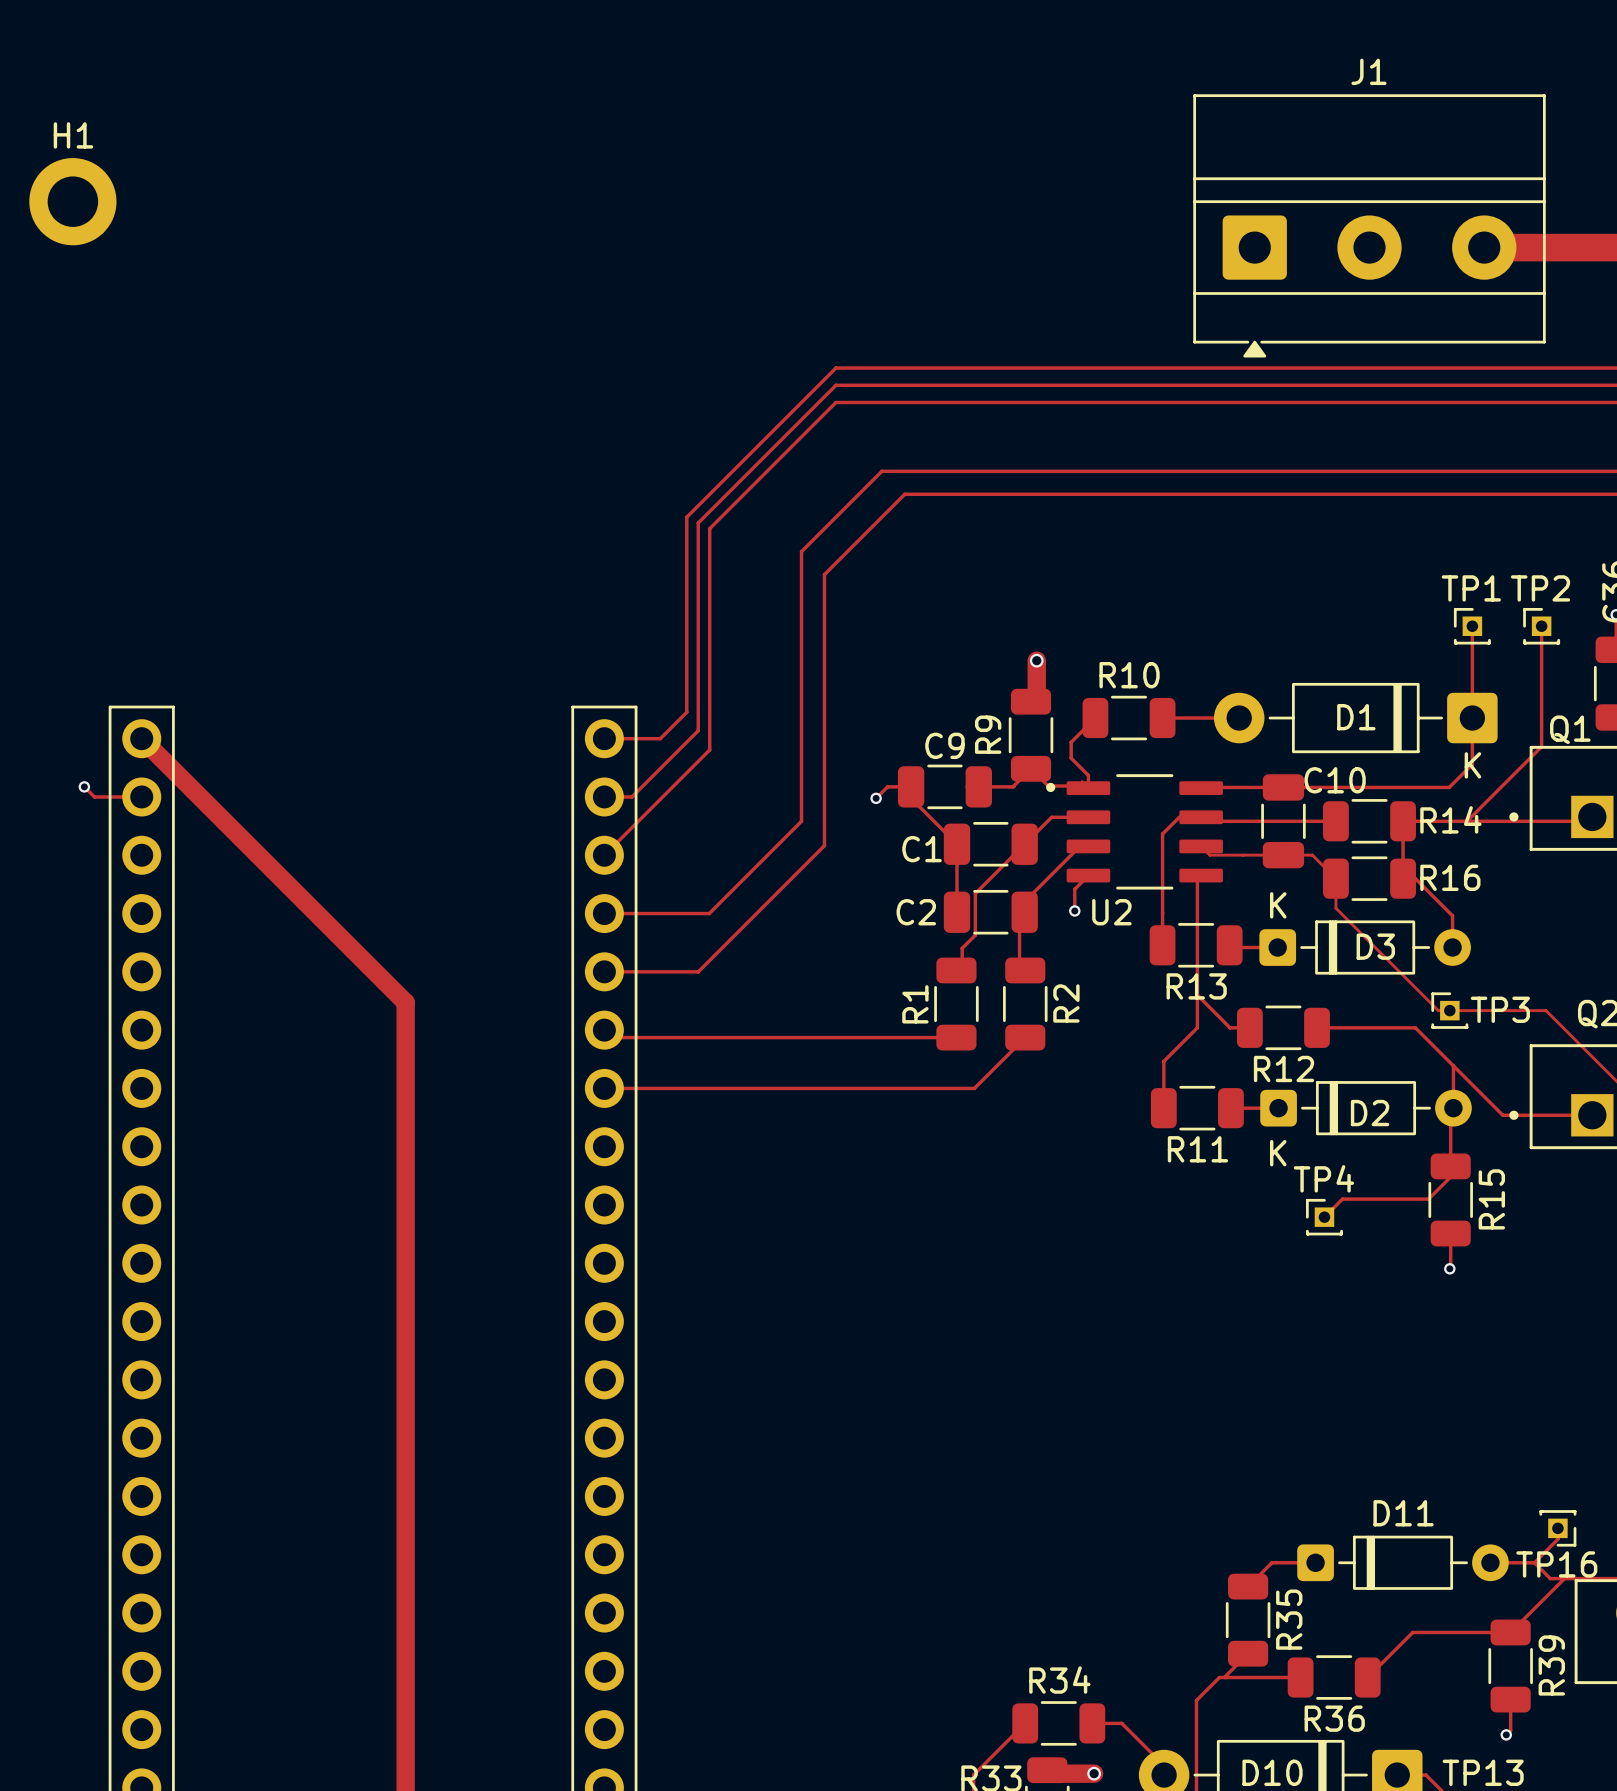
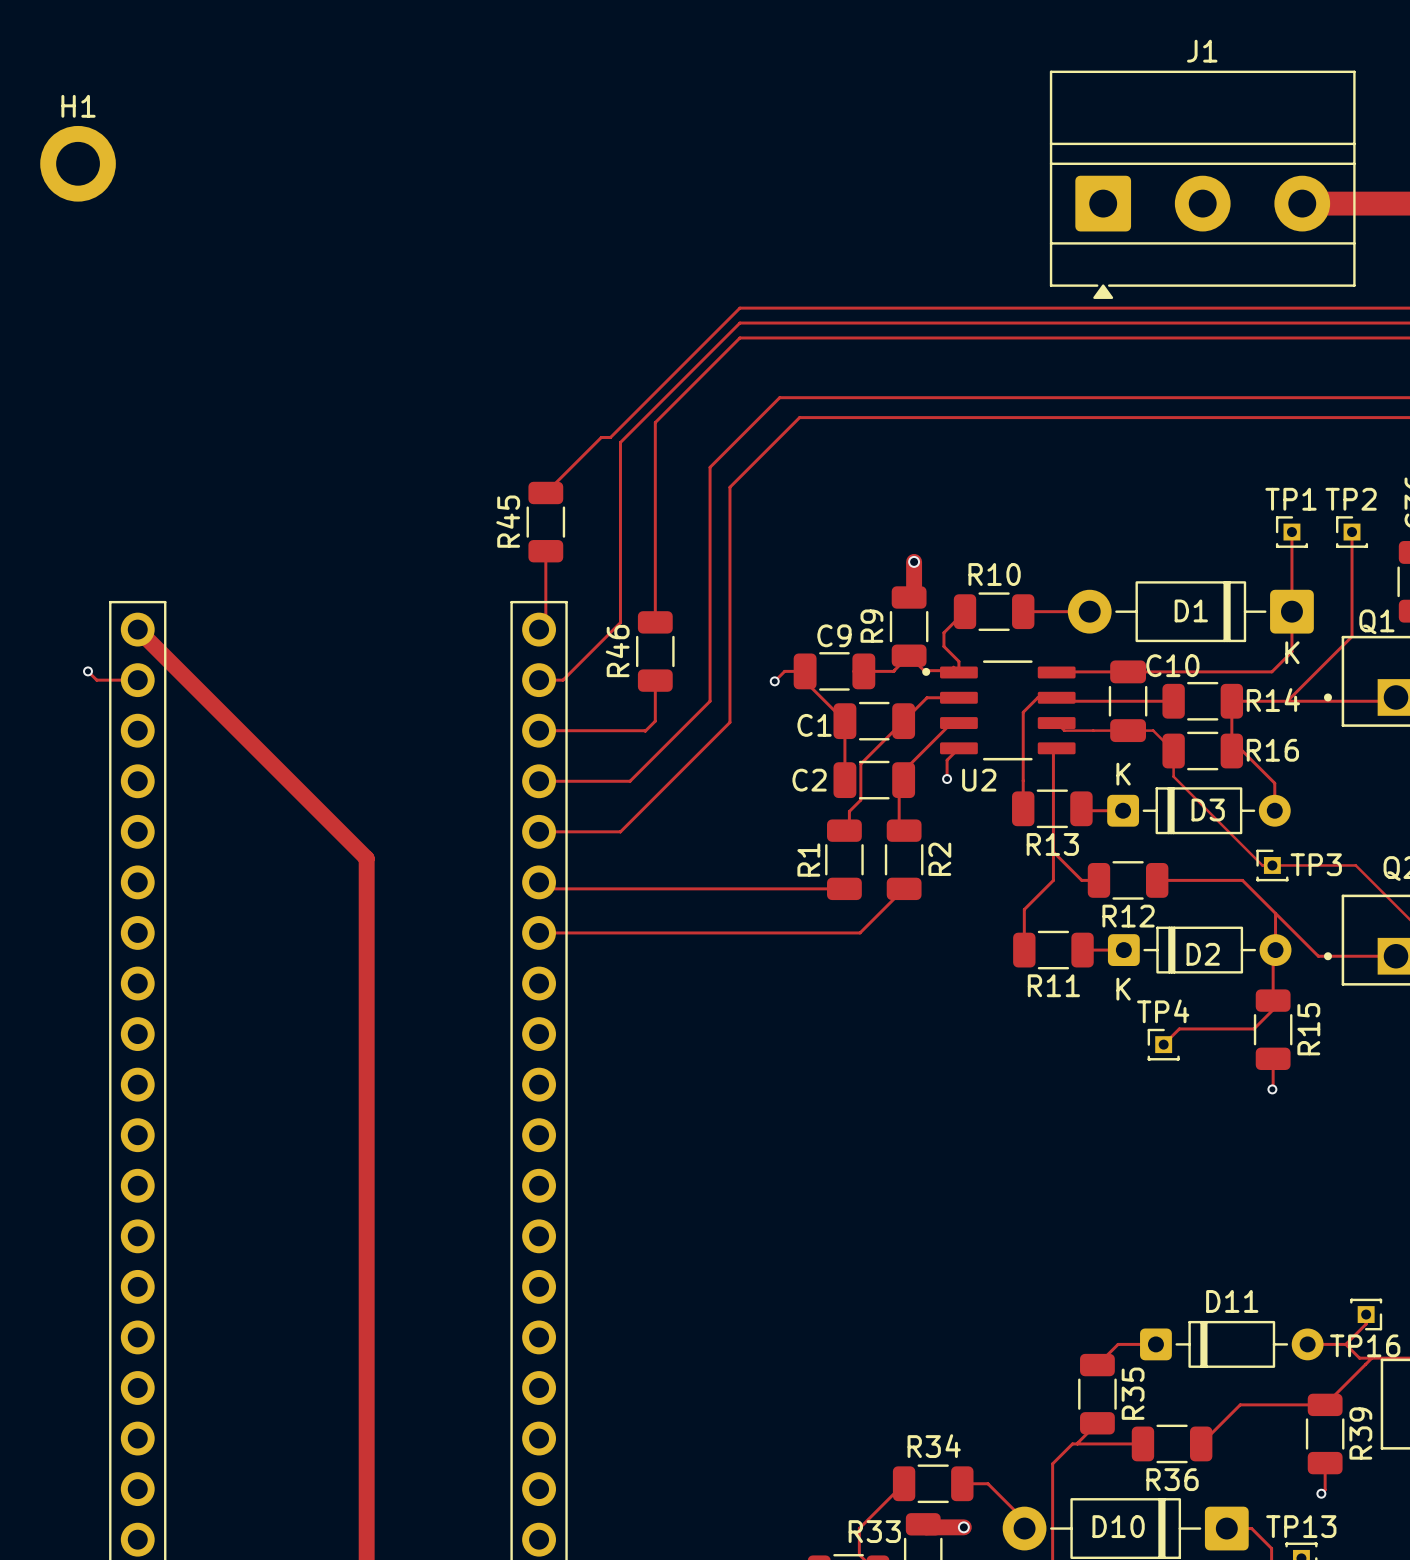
track: (738, 500) (709, 528) (709, 749) (604, 855) -> (655, 422) (655, 614)
track: (686, 517) (686, 712) (660, 738) (604, 738) -> (545, 551) (545, 622) (539, 629)
track: none -> (610, 437) (601, 437) (545, 492)
R45: none -> (545, 522)
R46: none -> (655, 651)
track: none -> (655, 680) (655, 721) (645, 731) (539, 730)

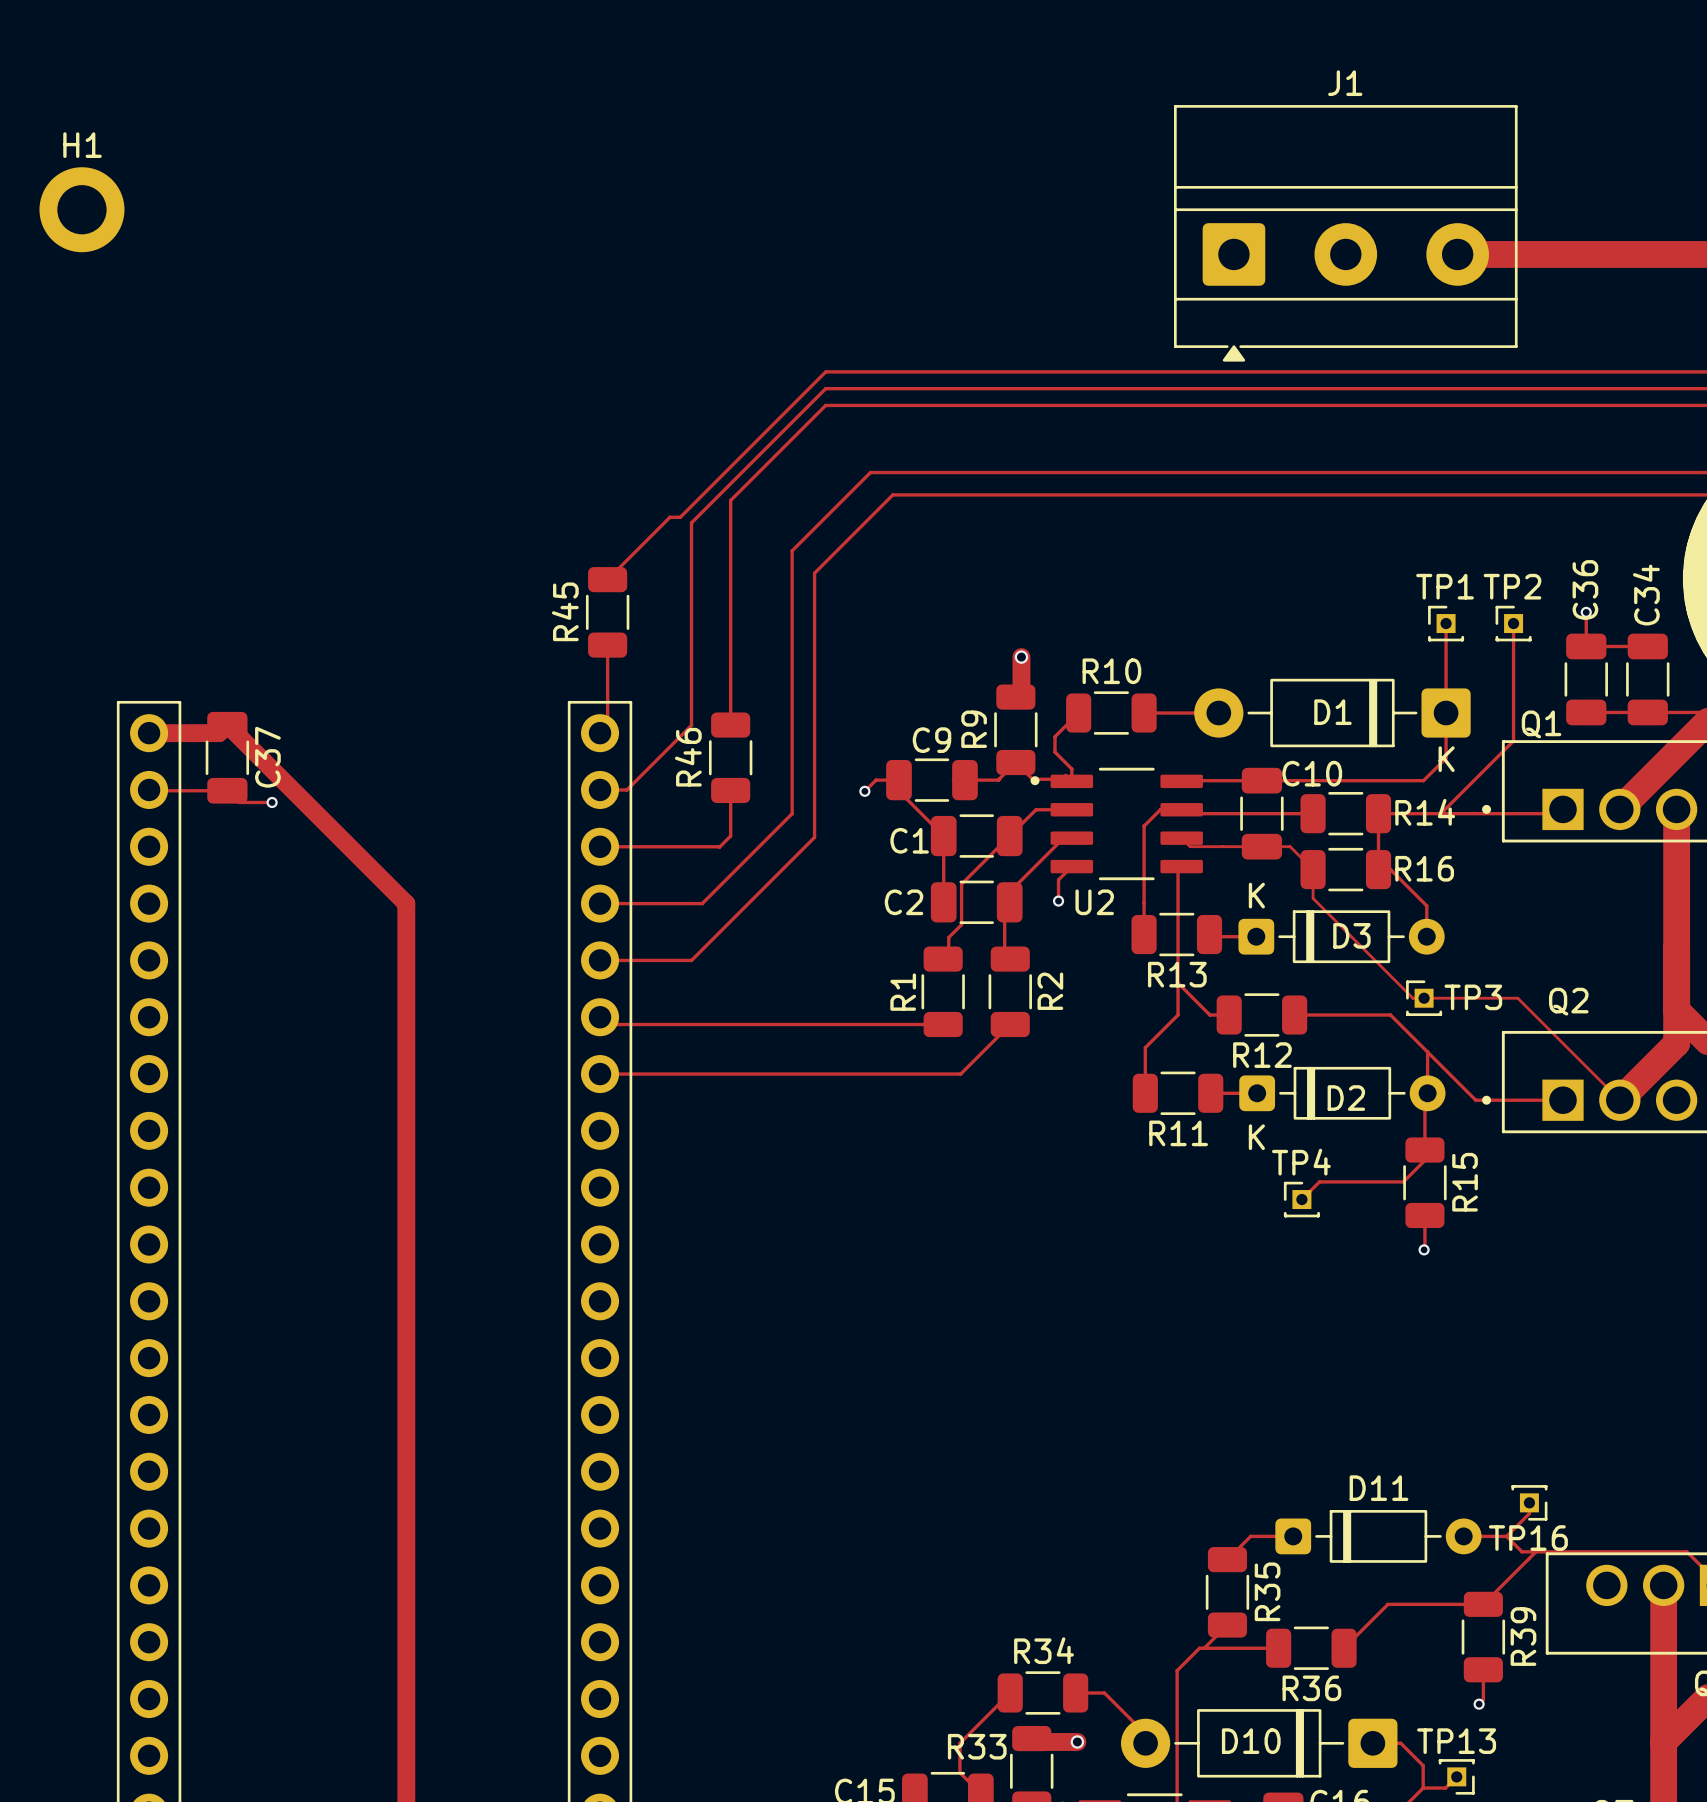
track: (137, 629) (366, 858) -> (149, 733) (218, 733) (227, 724) (406, 903) (406, 990)
C37: none -> (227, 757)
track: (87, 671) (96, 680) (137, 680) -> (272, 802) (239, 802) (227, 790) (149, 789)
via: (87, 671) -> none
via: none -> (272, 802)

